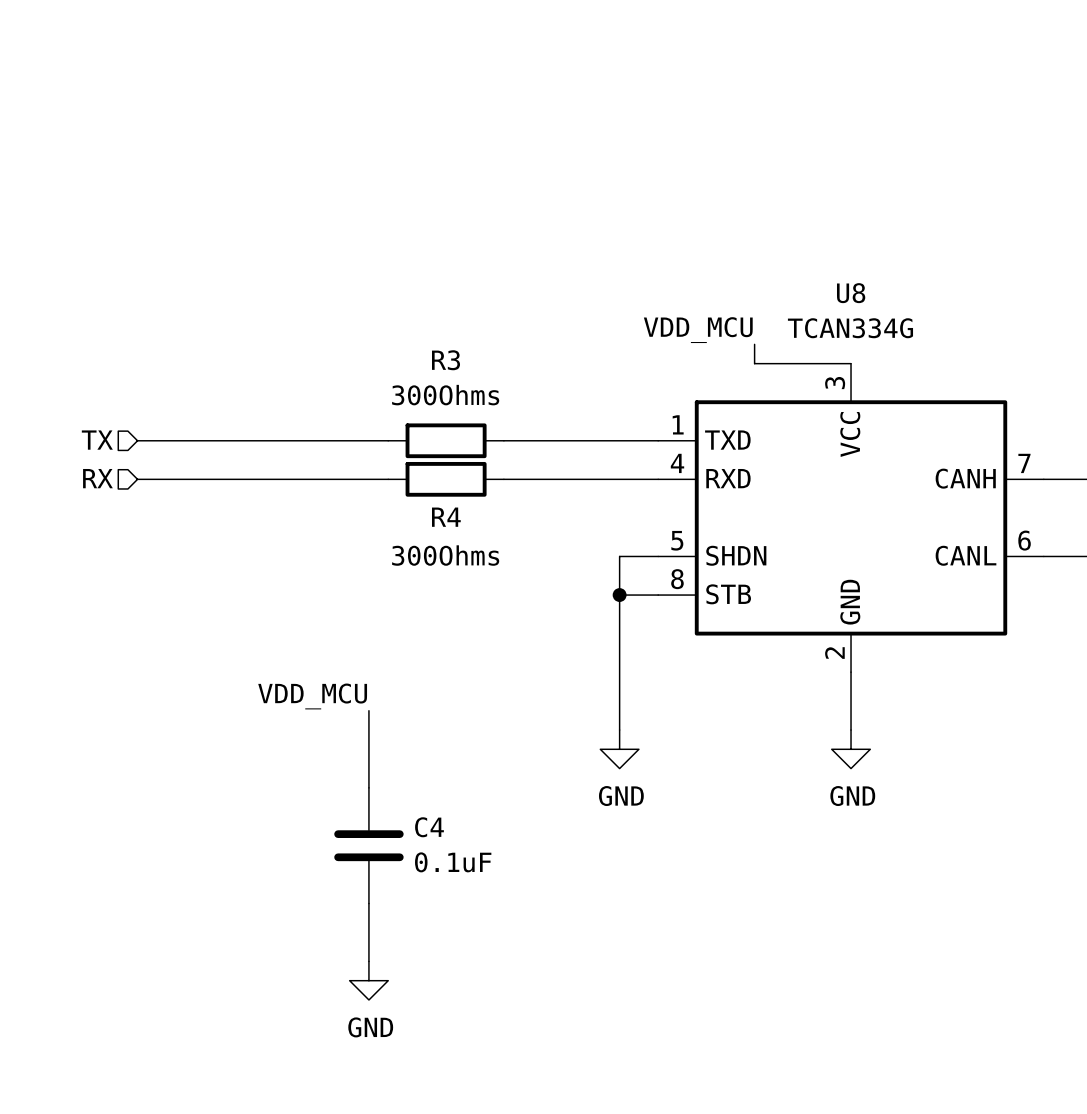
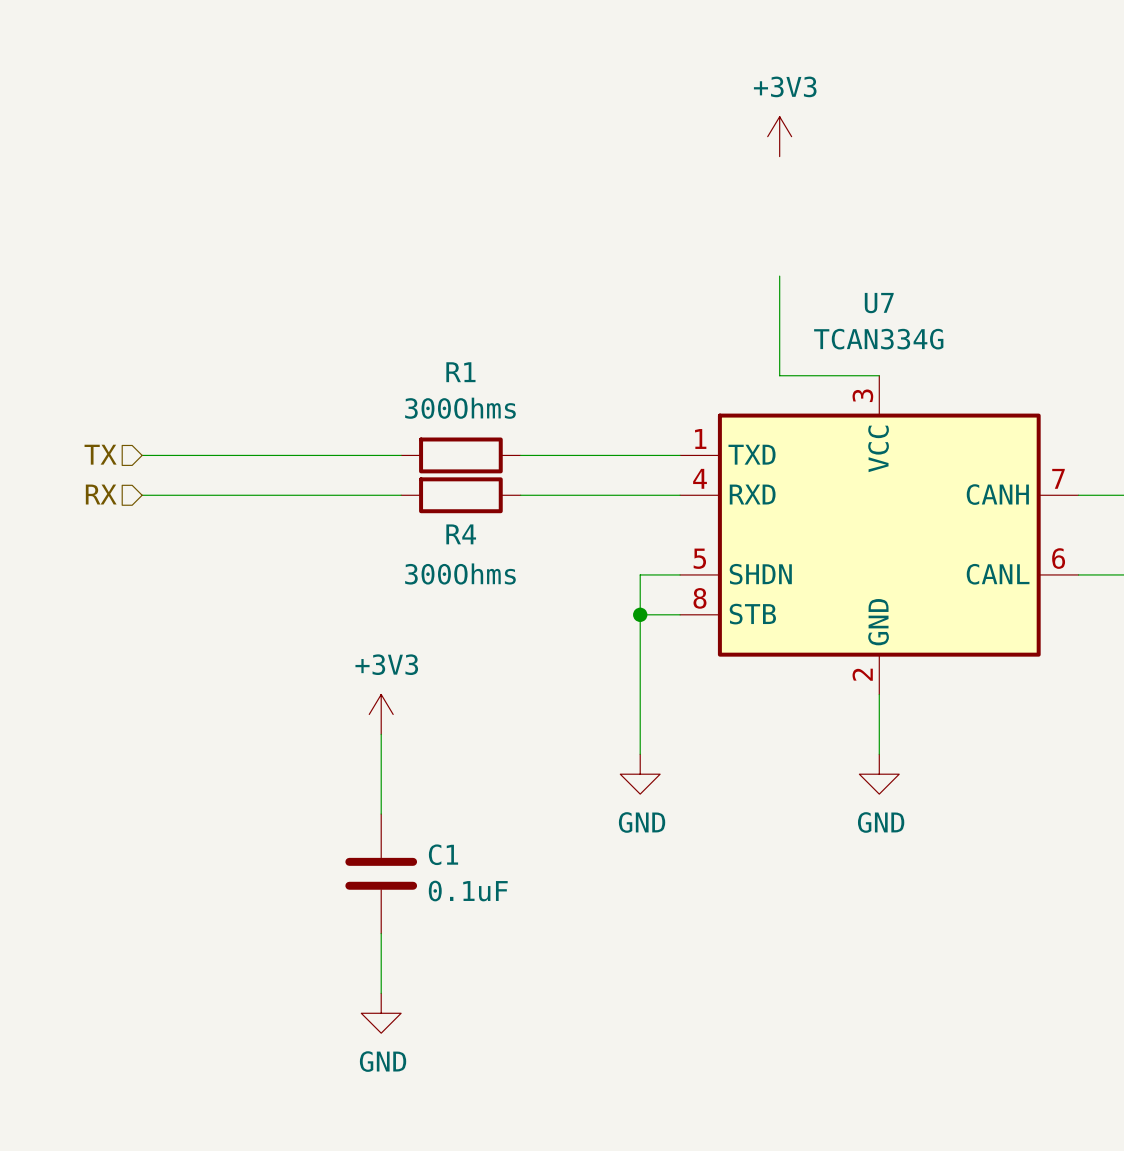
power symbol: none -> +3V3 (779, 136)
wire: none -> (779, 276) (779, 355)
U8 name: U8 (851, 293) -> U7 (879, 303)
label: VDD_MCU (698, 330) -> none
R3 name: R3 (446, 360) -> R1 (460, 372)
power symbol: none -> +3V3 (381, 714)
label: VDD_MCU (312, 696) -> none
C4 name: C4 (429, 827) -> C1 (443, 854)

